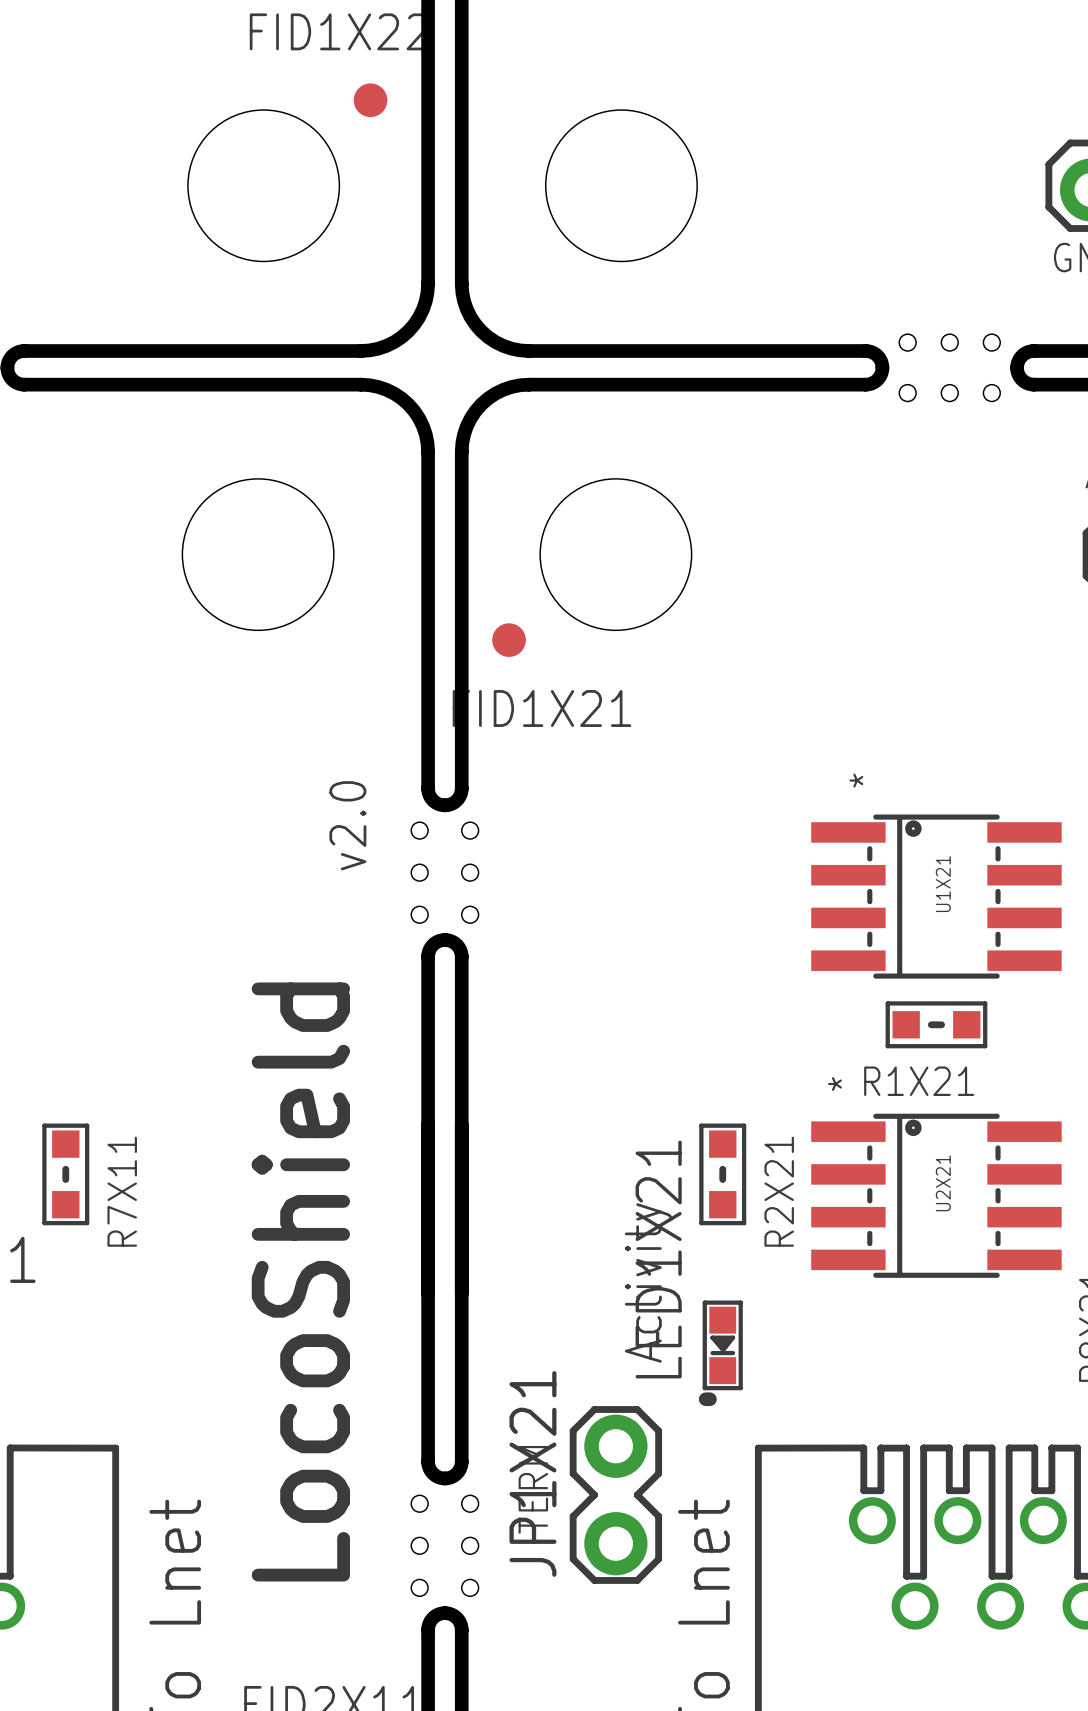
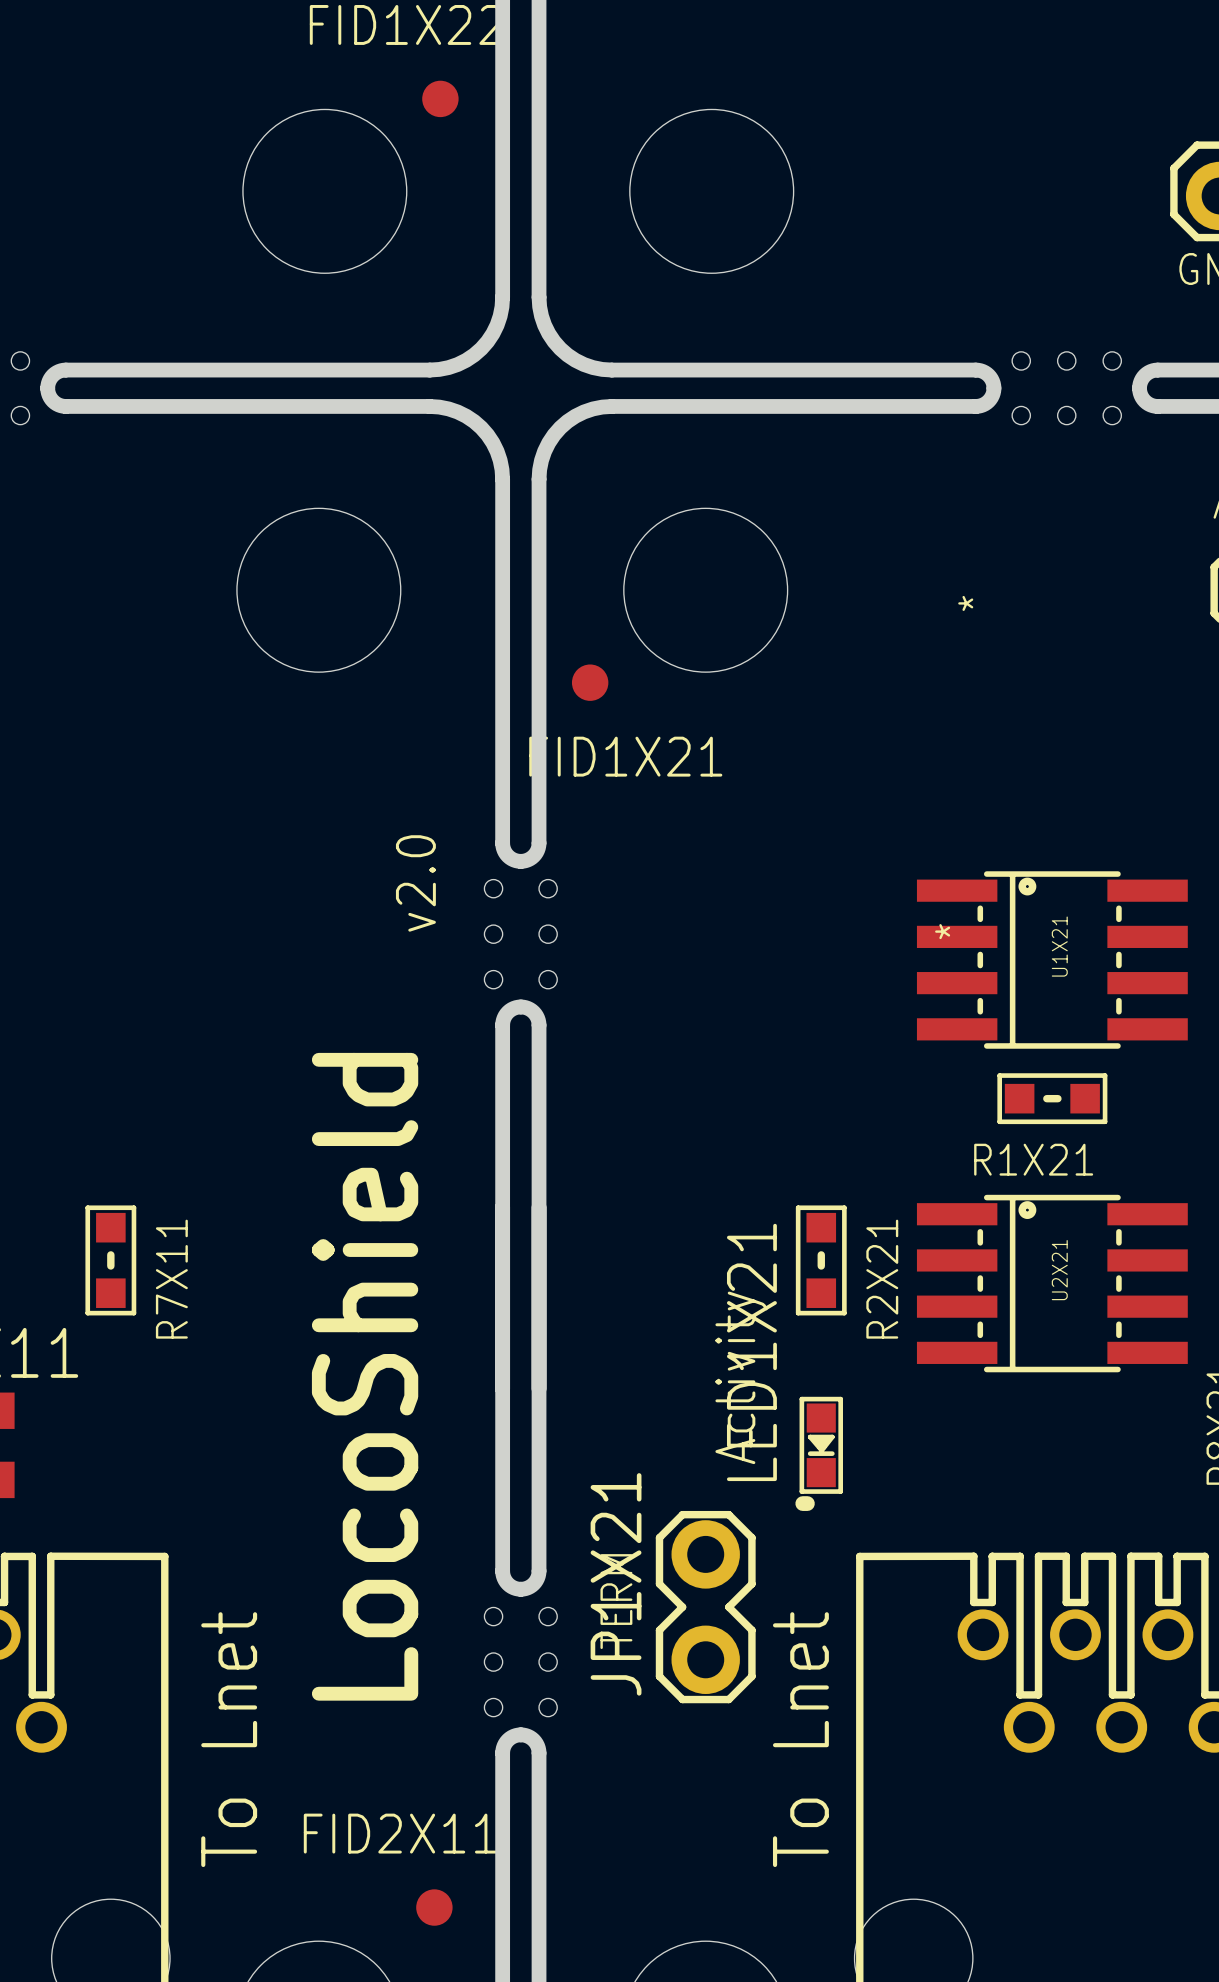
text: none -> * (965, 603)
text position: * (856, 780) -> * (942, 931)
text: * (834, 1084) -> none

